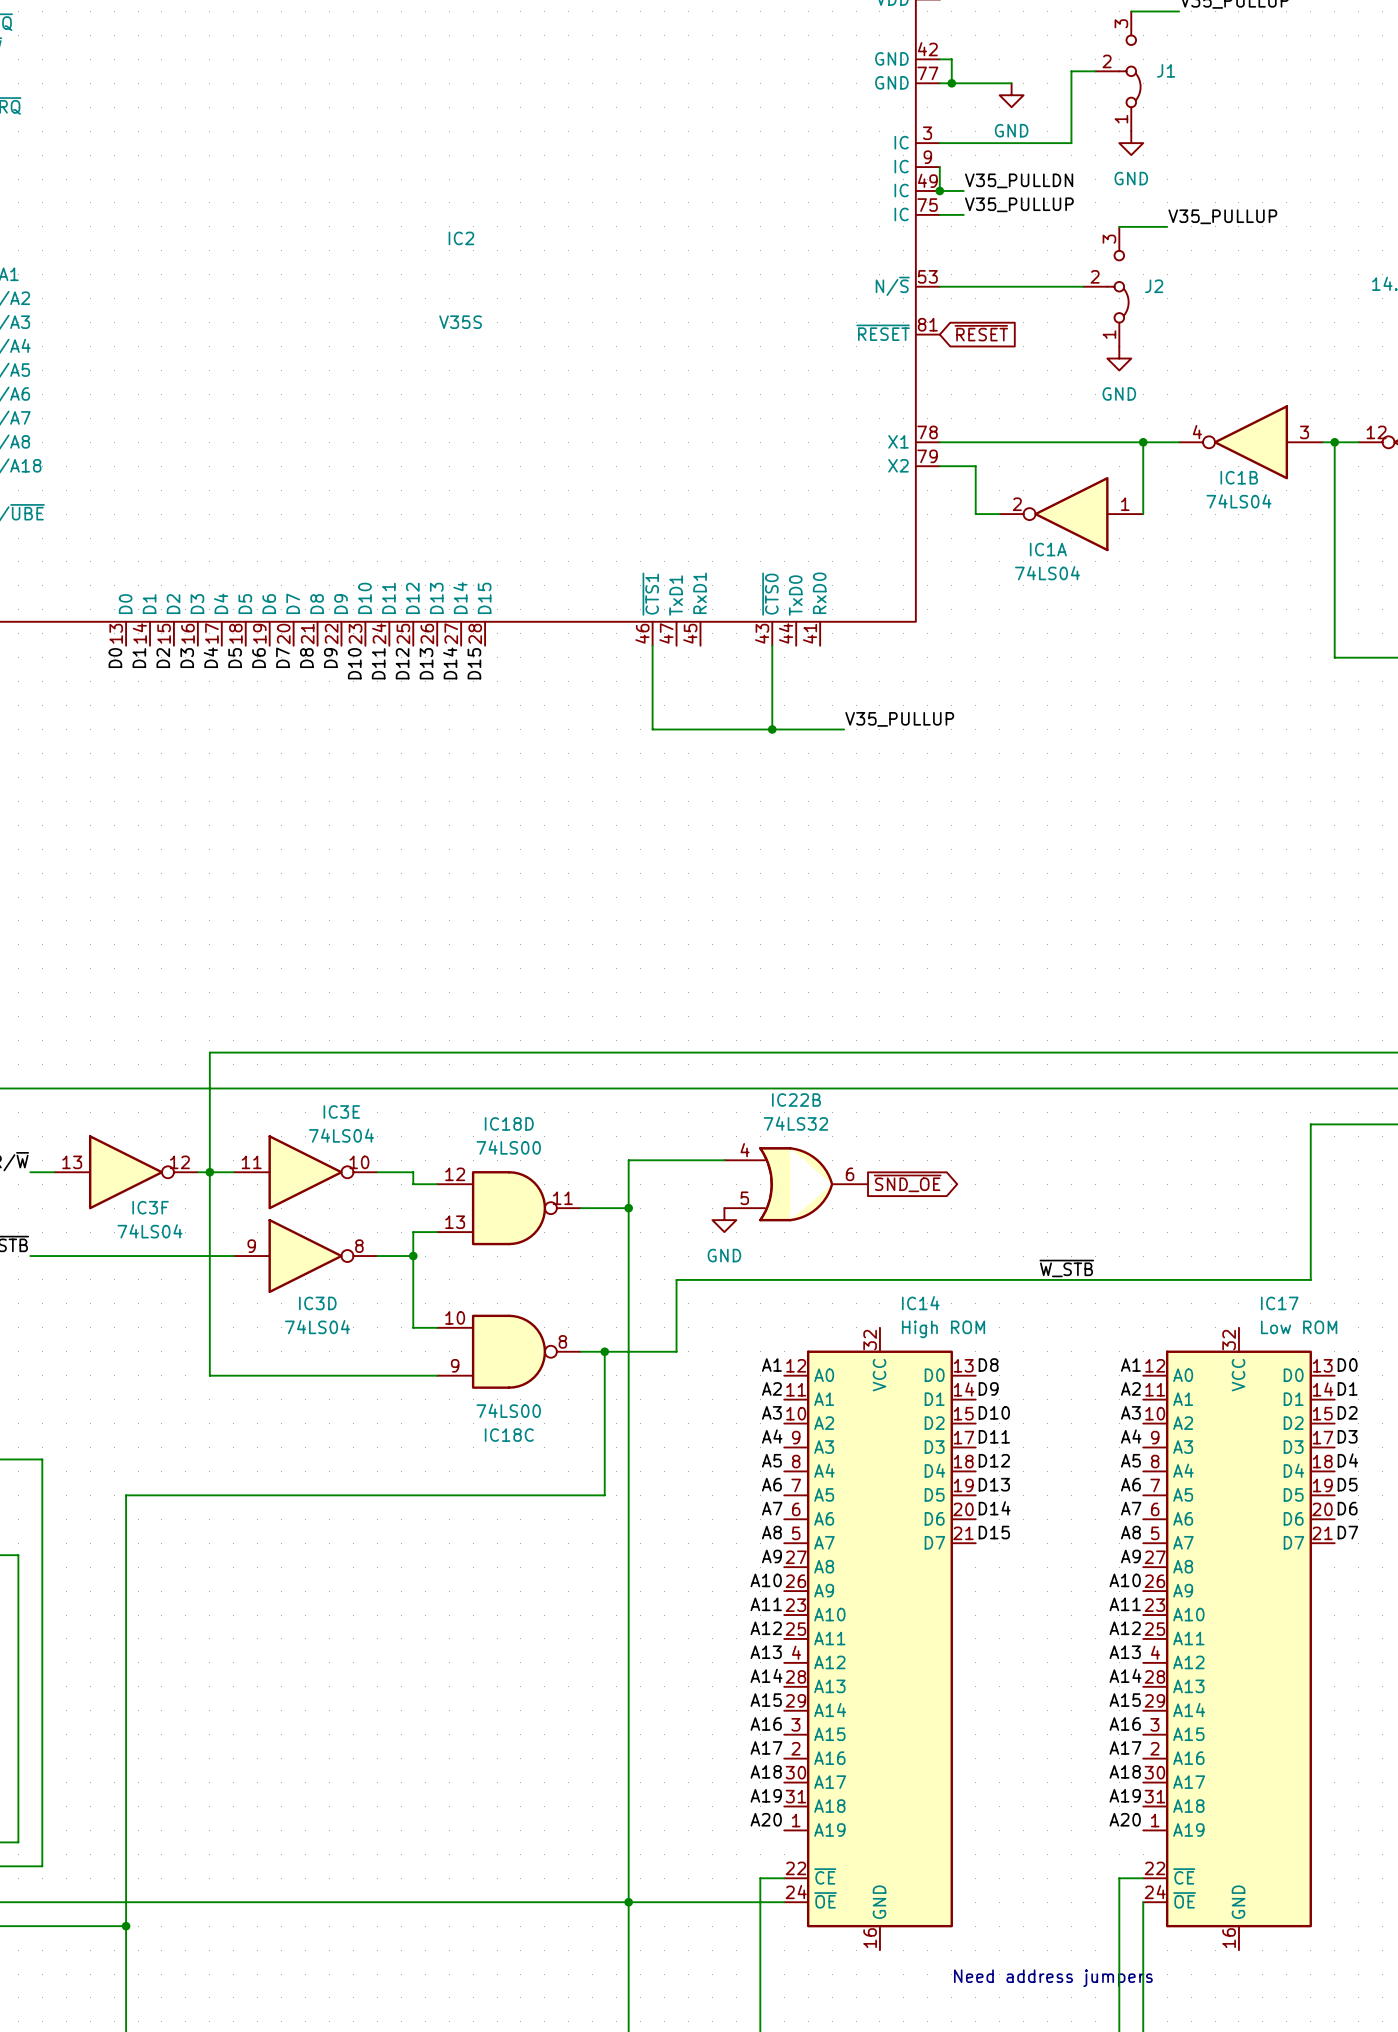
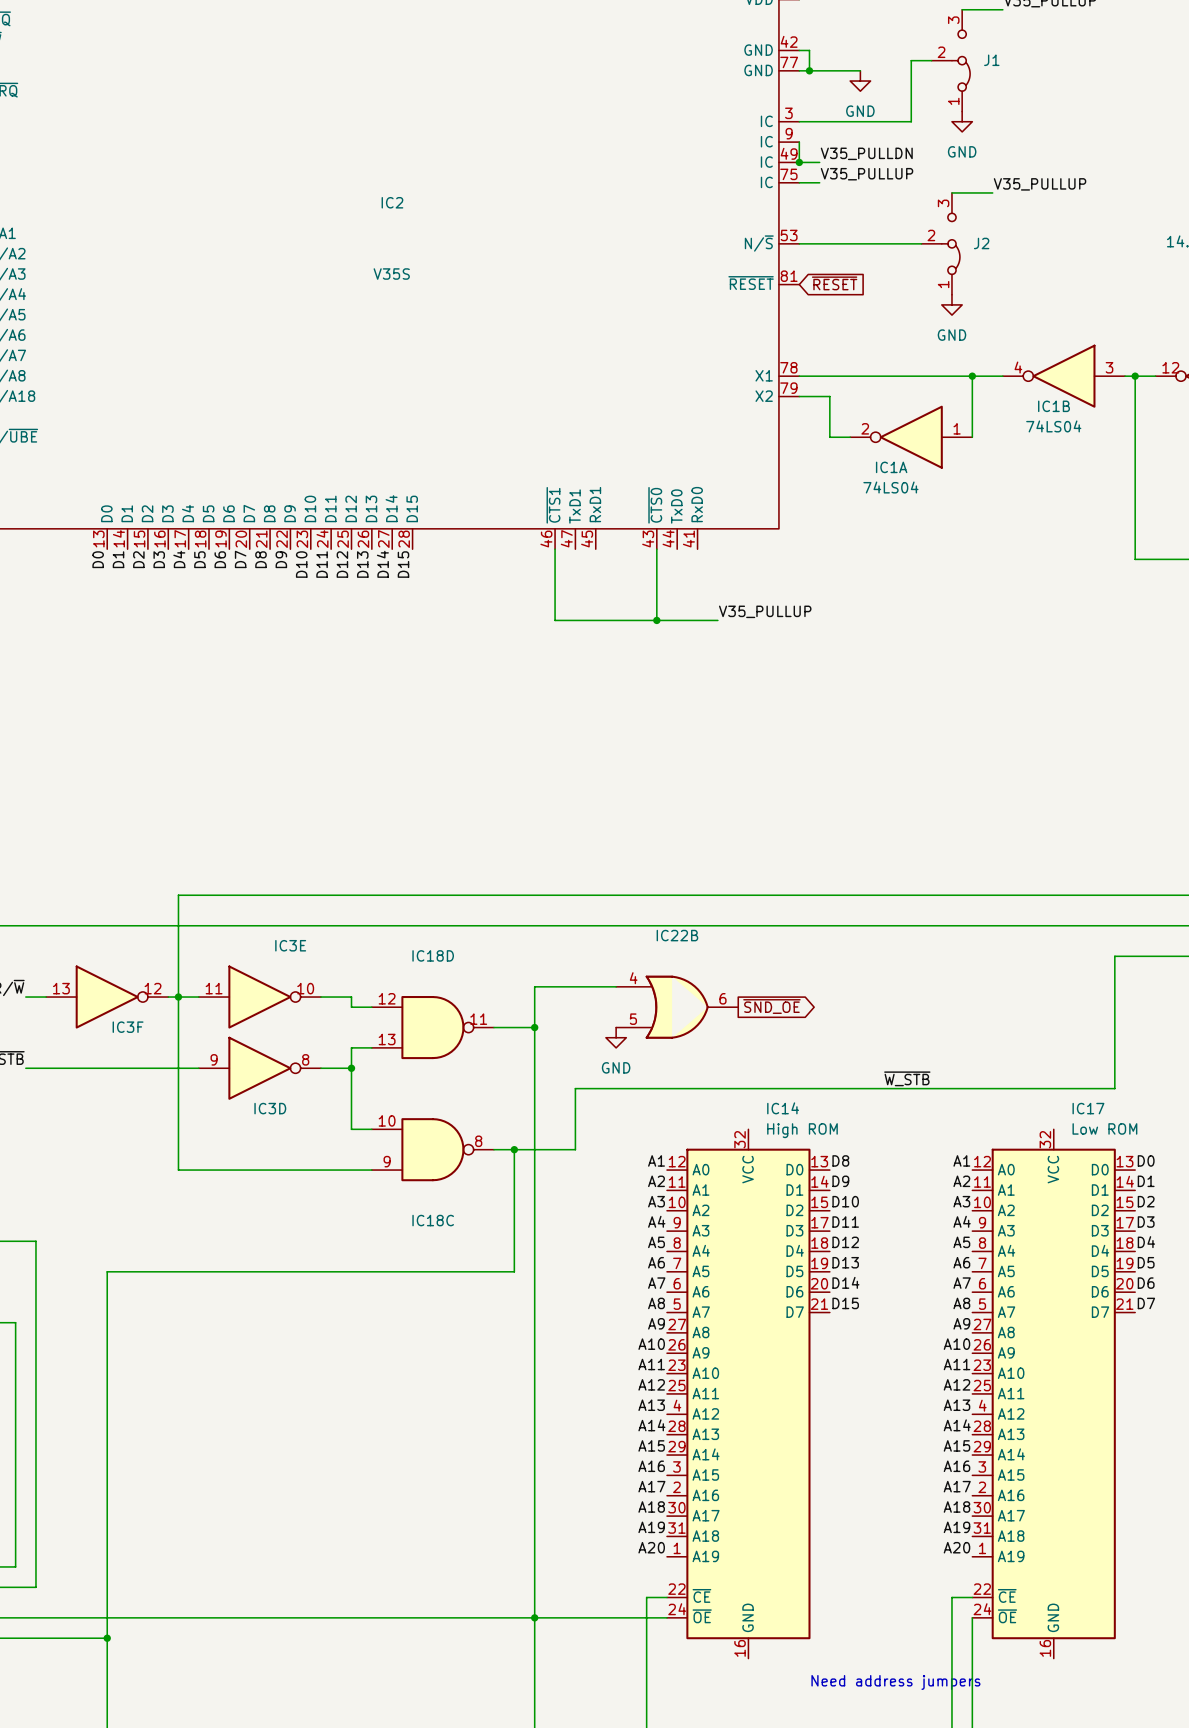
IC22B value: 74LS32 (795, 1123) -> none
IC3E value: 74LS04 (341, 1135) -> none
IC18D value: 74LS00 (508, 1147) -> none
IC3F value: 74LS04 (150, 1231) -> none
IC3D value: 74LS04 (317, 1327) -> none
IC18C value: 74LS00 (508, 1410) -> none

